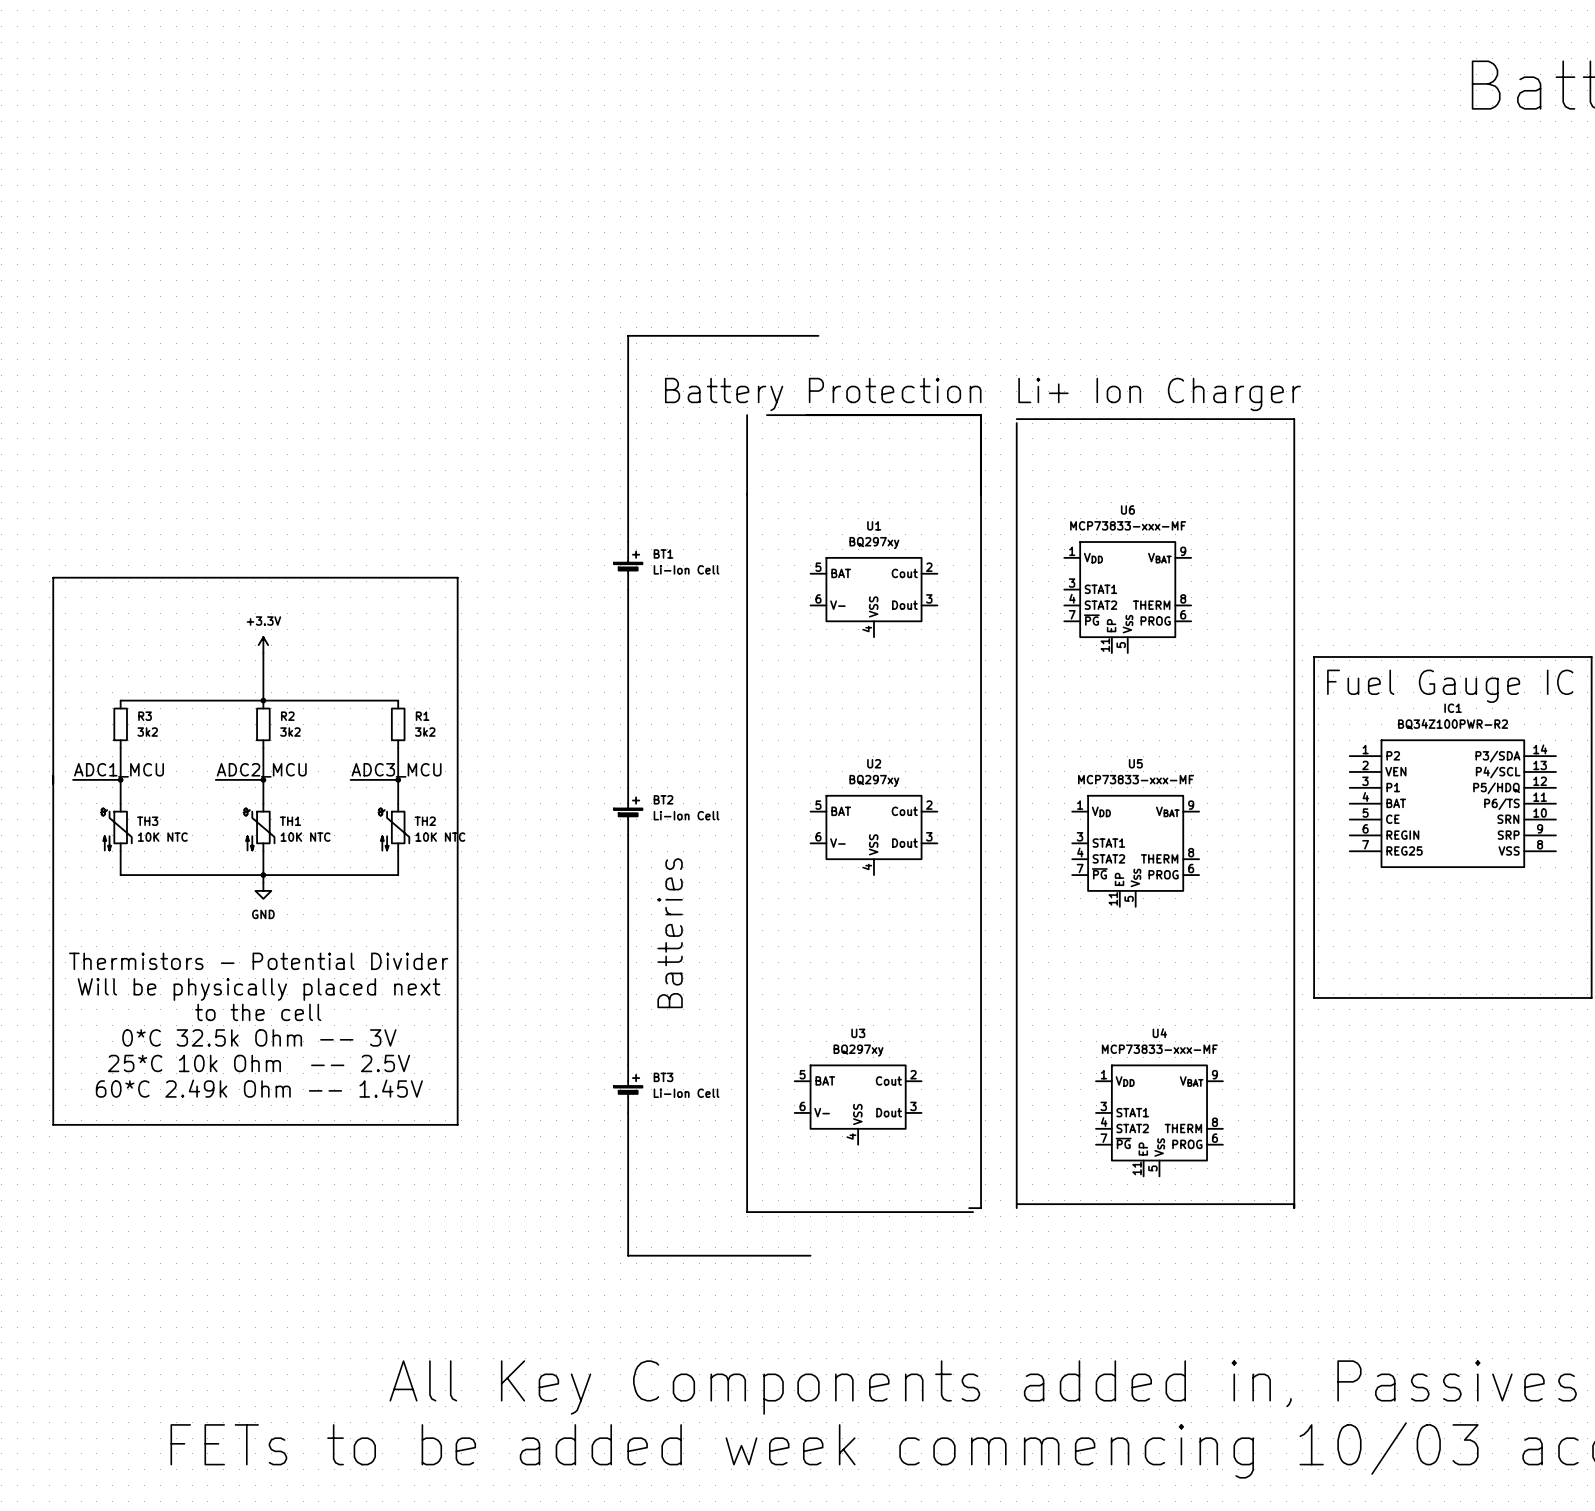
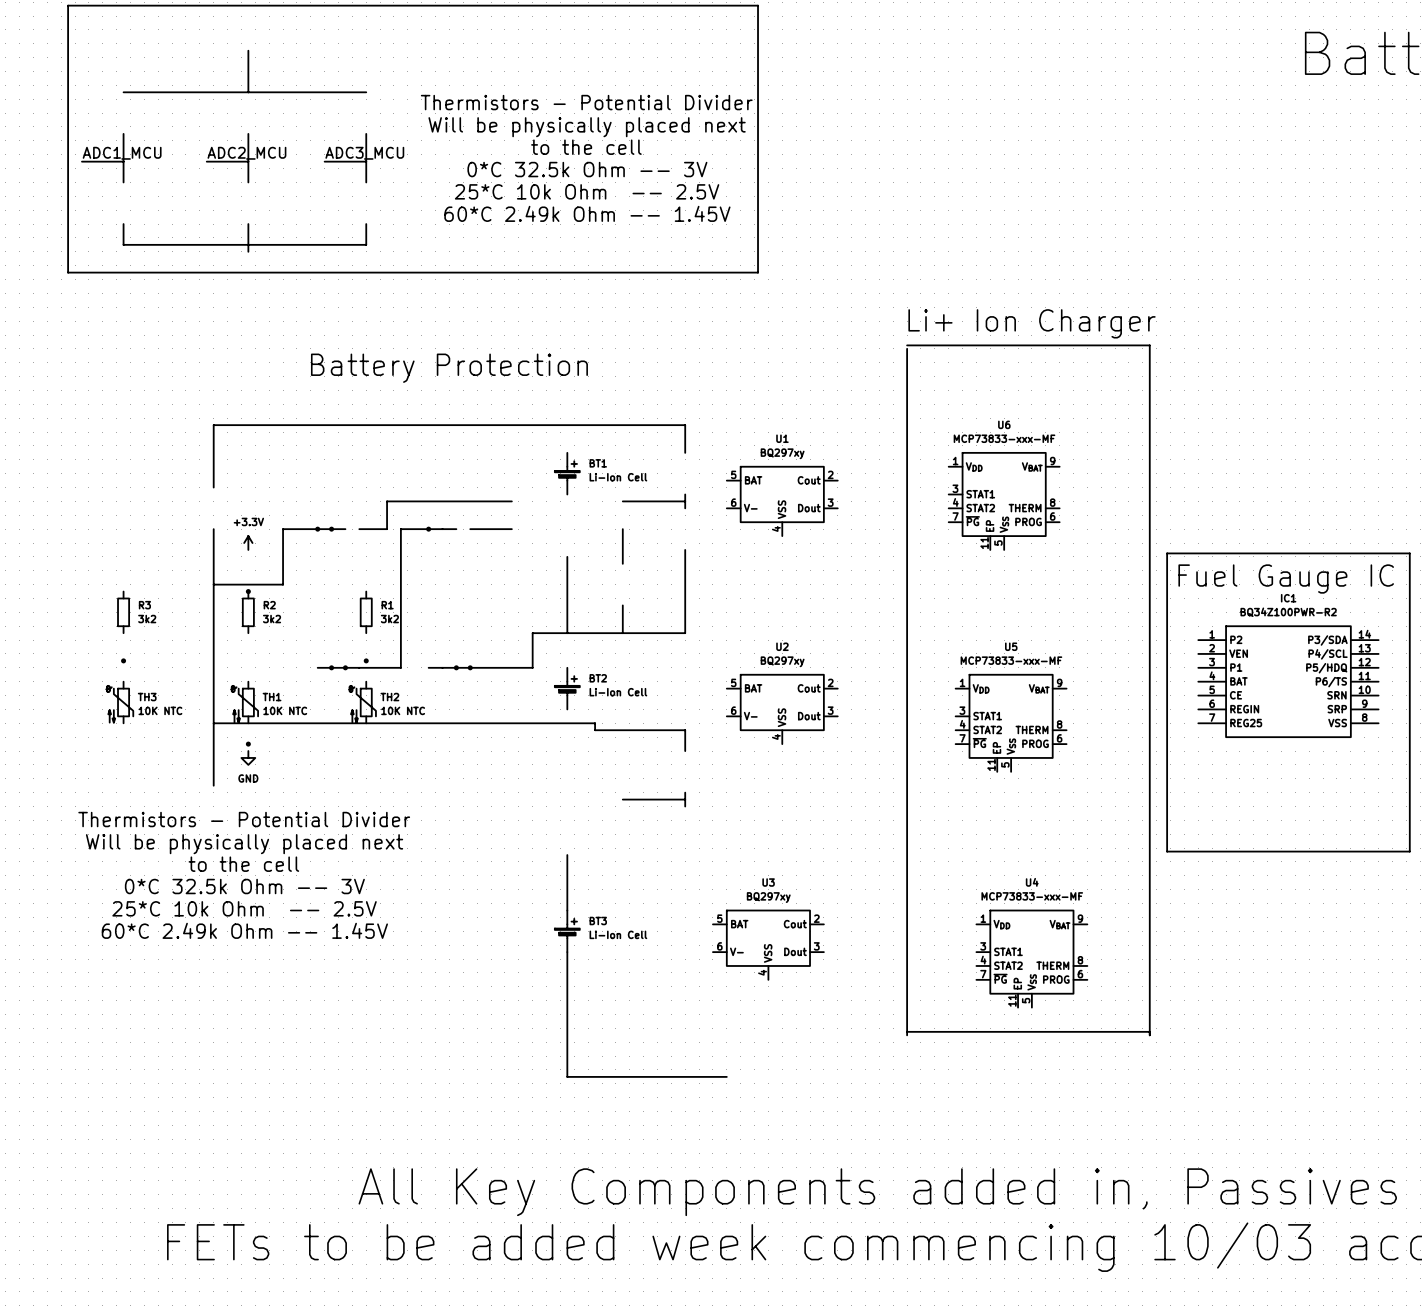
line: none -> (68, 5) (758, 5) (758, 272) (68, 272) (68, 5)
wire: none -> (248, 50) (248, 92)
wire: none -> (123, 92) (366, 92)
text: none -> Thermistors - Potential Divider (586, 102)
text: none -> Will be physically placed next (587, 127)
wire: none -> (123, 133) (123, 182)
wire: none -> (248, 133) (248, 182)
wire: none -> (366, 133) (366, 182)
text: none -> to the cell (586, 147)
label: none -> ADC1_MCU (122, 153)
label: none -> ADC2_MCU (246, 153)
label: none -> ADC3_MCU (364, 153)
wire: none -> (81, 161) (123, 161)
wire: none -> (206, 161) (248, 161)
wire: none -> (324, 161) (366, 161)
text: none -> 0*C 32.5k Ohm -- 3V (587, 169)
text: none -> 25*C 10k Ohm -- 2.5V (587, 191)
text: none -> 60*C 2.49k Ohm -- 1.45V (587, 213)
wire: none -> (123, 224) (123, 244) (366, 244) (366, 224)
wire: none -> (248, 224) (248, 251)
wire: (818, 335) (628, 335) (628, 542) -> none
text: Battery Protection (823, 394) -> none
line: (747, 415) (747, 1212) (973, 1212) -> none
line: (766, 415) (981, 415) (981, 1208) (969, 1208) -> none
text: none -> Battery Protection (449, 368)
wire: none -> (685, 452) (685, 425) (213, 425) (213, 487)
line: (53, 577) (53, 1124) (457, 1124) (457, 577) (53, 577) -> none
wire: (628, 589) (628, 660) -> none
wire: none -> (685, 494) (685, 508)
wire: none -> (511, 501) (387, 501) (387, 529) (359, 529)
wire: none -> (622, 501) (685, 501)
wire: none -> (213, 529) (213, 785)
junction: none -> (317, 529)
junction: none -> (331, 529)
wire: none -> (345, 529) (283, 529) (283, 584) (213, 584)
junction: none -> (428, 529)
wire: none -> (456, 529) (400, 529) (400, 667) (317, 667)
wire: none -> (470, 529) (511, 529)
wire: (263, 653) (263, 700) -> none
wire: none -> (685, 549) (685, 633) (532, 633) (532, 667) (428, 667)
wire: (120, 700) (398, 700) -> none
wire: none -> (622, 605) (622, 633)
wire: (120, 748) (120, 803) -> none
wire: (263, 748) (263, 803) -> none
wire: (398, 748) (398, 803) -> none
wire: (628, 748) (628, 787) -> (622, 529) (622, 563)
label: ADC1_MCU (119, 770) -> none
label: ADC2_MCU (261, 770) -> none
label: ADC3_MCU (396, 770) -> none
wire: (73, 779) (120, 779) -> none
wire: (215, 779) (263, 779) -> none
junction: (263, 779) -> none
wire: (350, 779) (398, 779) -> none
junction: none -> (331, 667)
junction: none -> (345, 667)
junction: none -> (456, 667)
junction: none -> (470, 667)
wire: (628, 835) (628, 1001) -> none
wire: (120, 851) (120, 875) (398, 875) (398, 851) -> none
wire: none -> (213, 723) (595, 723) (595, 730) (685, 730) (685, 751)
wire: (263, 851) (263, 882) -> none
wire: none -> (685, 792) (685, 806)
text: Batteries (670, 933) -> none
wire: none -> (622, 799) (685, 799)

